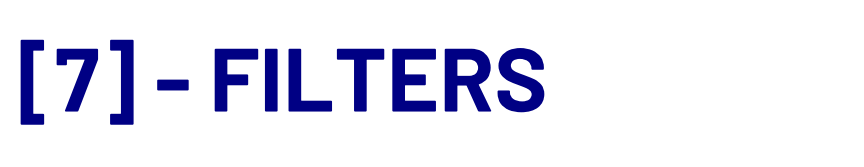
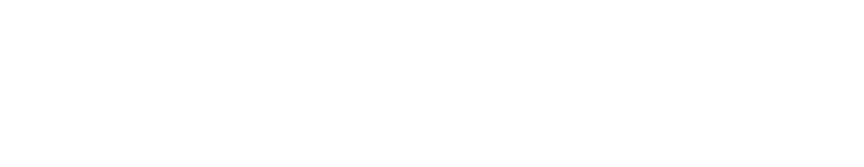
text: [7] - FILTERS (282, 82) -> none

